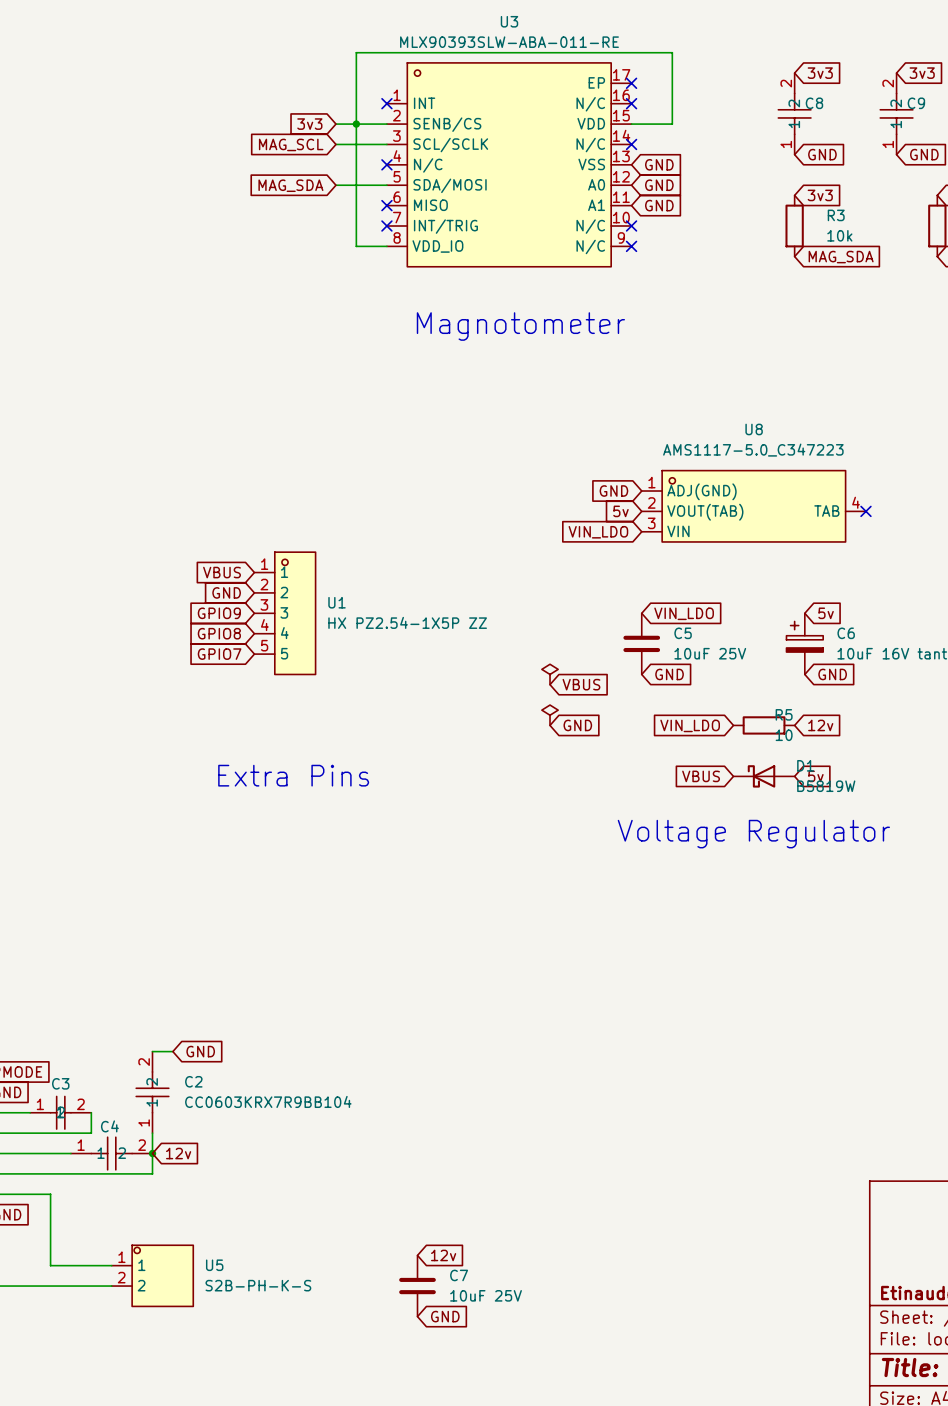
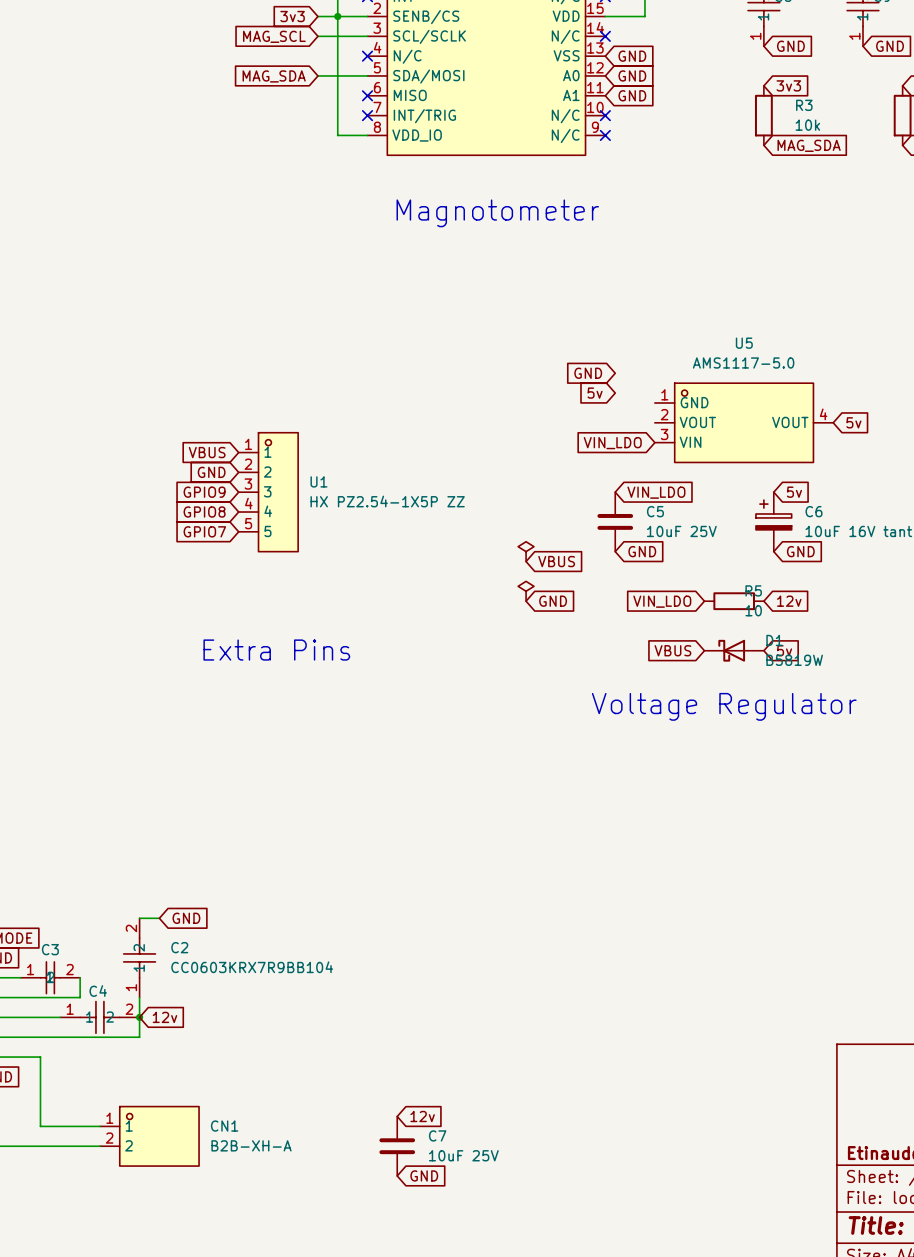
U8: AMS1117-5.0_C347223 (753, 506) -> none
no-connect mark: (865, 511) -> none
global label position: VIN_LDO (598, 532) -> VIN_LDO (612, 443)
global label: none -> 5v (853, 422)
U5 symbol: [111, 1245, 194, 1307] -> [654, 383, 834, 463]
U5 name position: U5 (214, 1265) -> U5 (744, 343)
CN1: none -> B2B-XH-A (149, 1136)
U5 value: S2B-PH-K-S (258, 1285) -> AMS1117-5.0 (743, 362)

